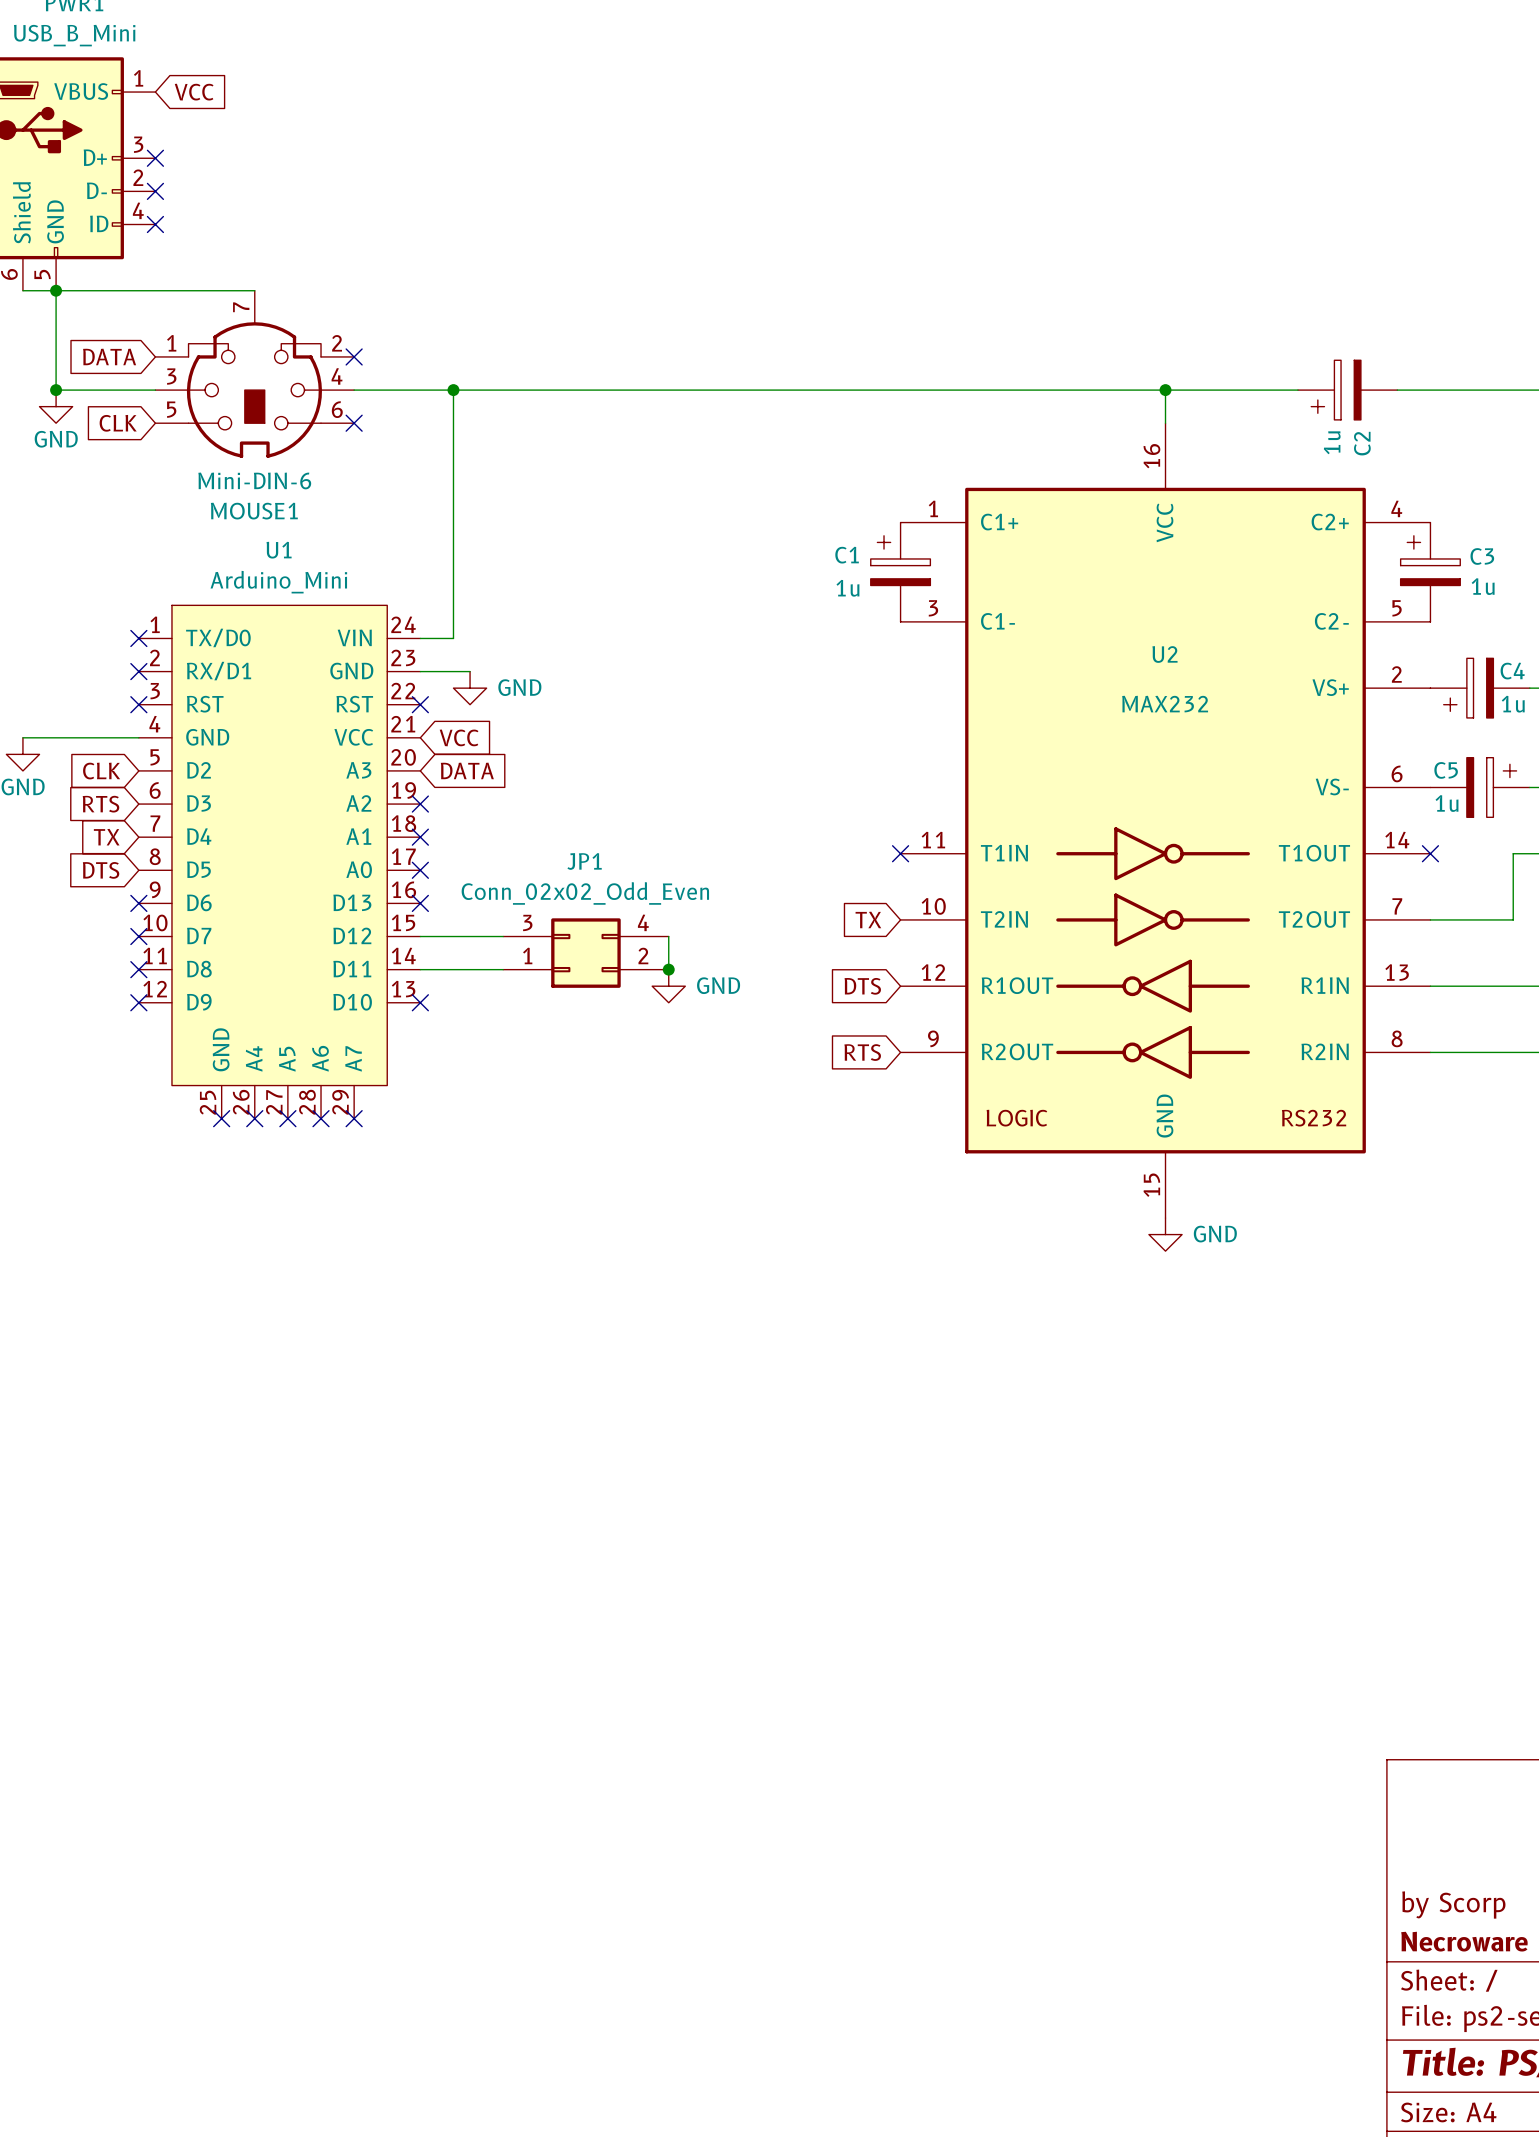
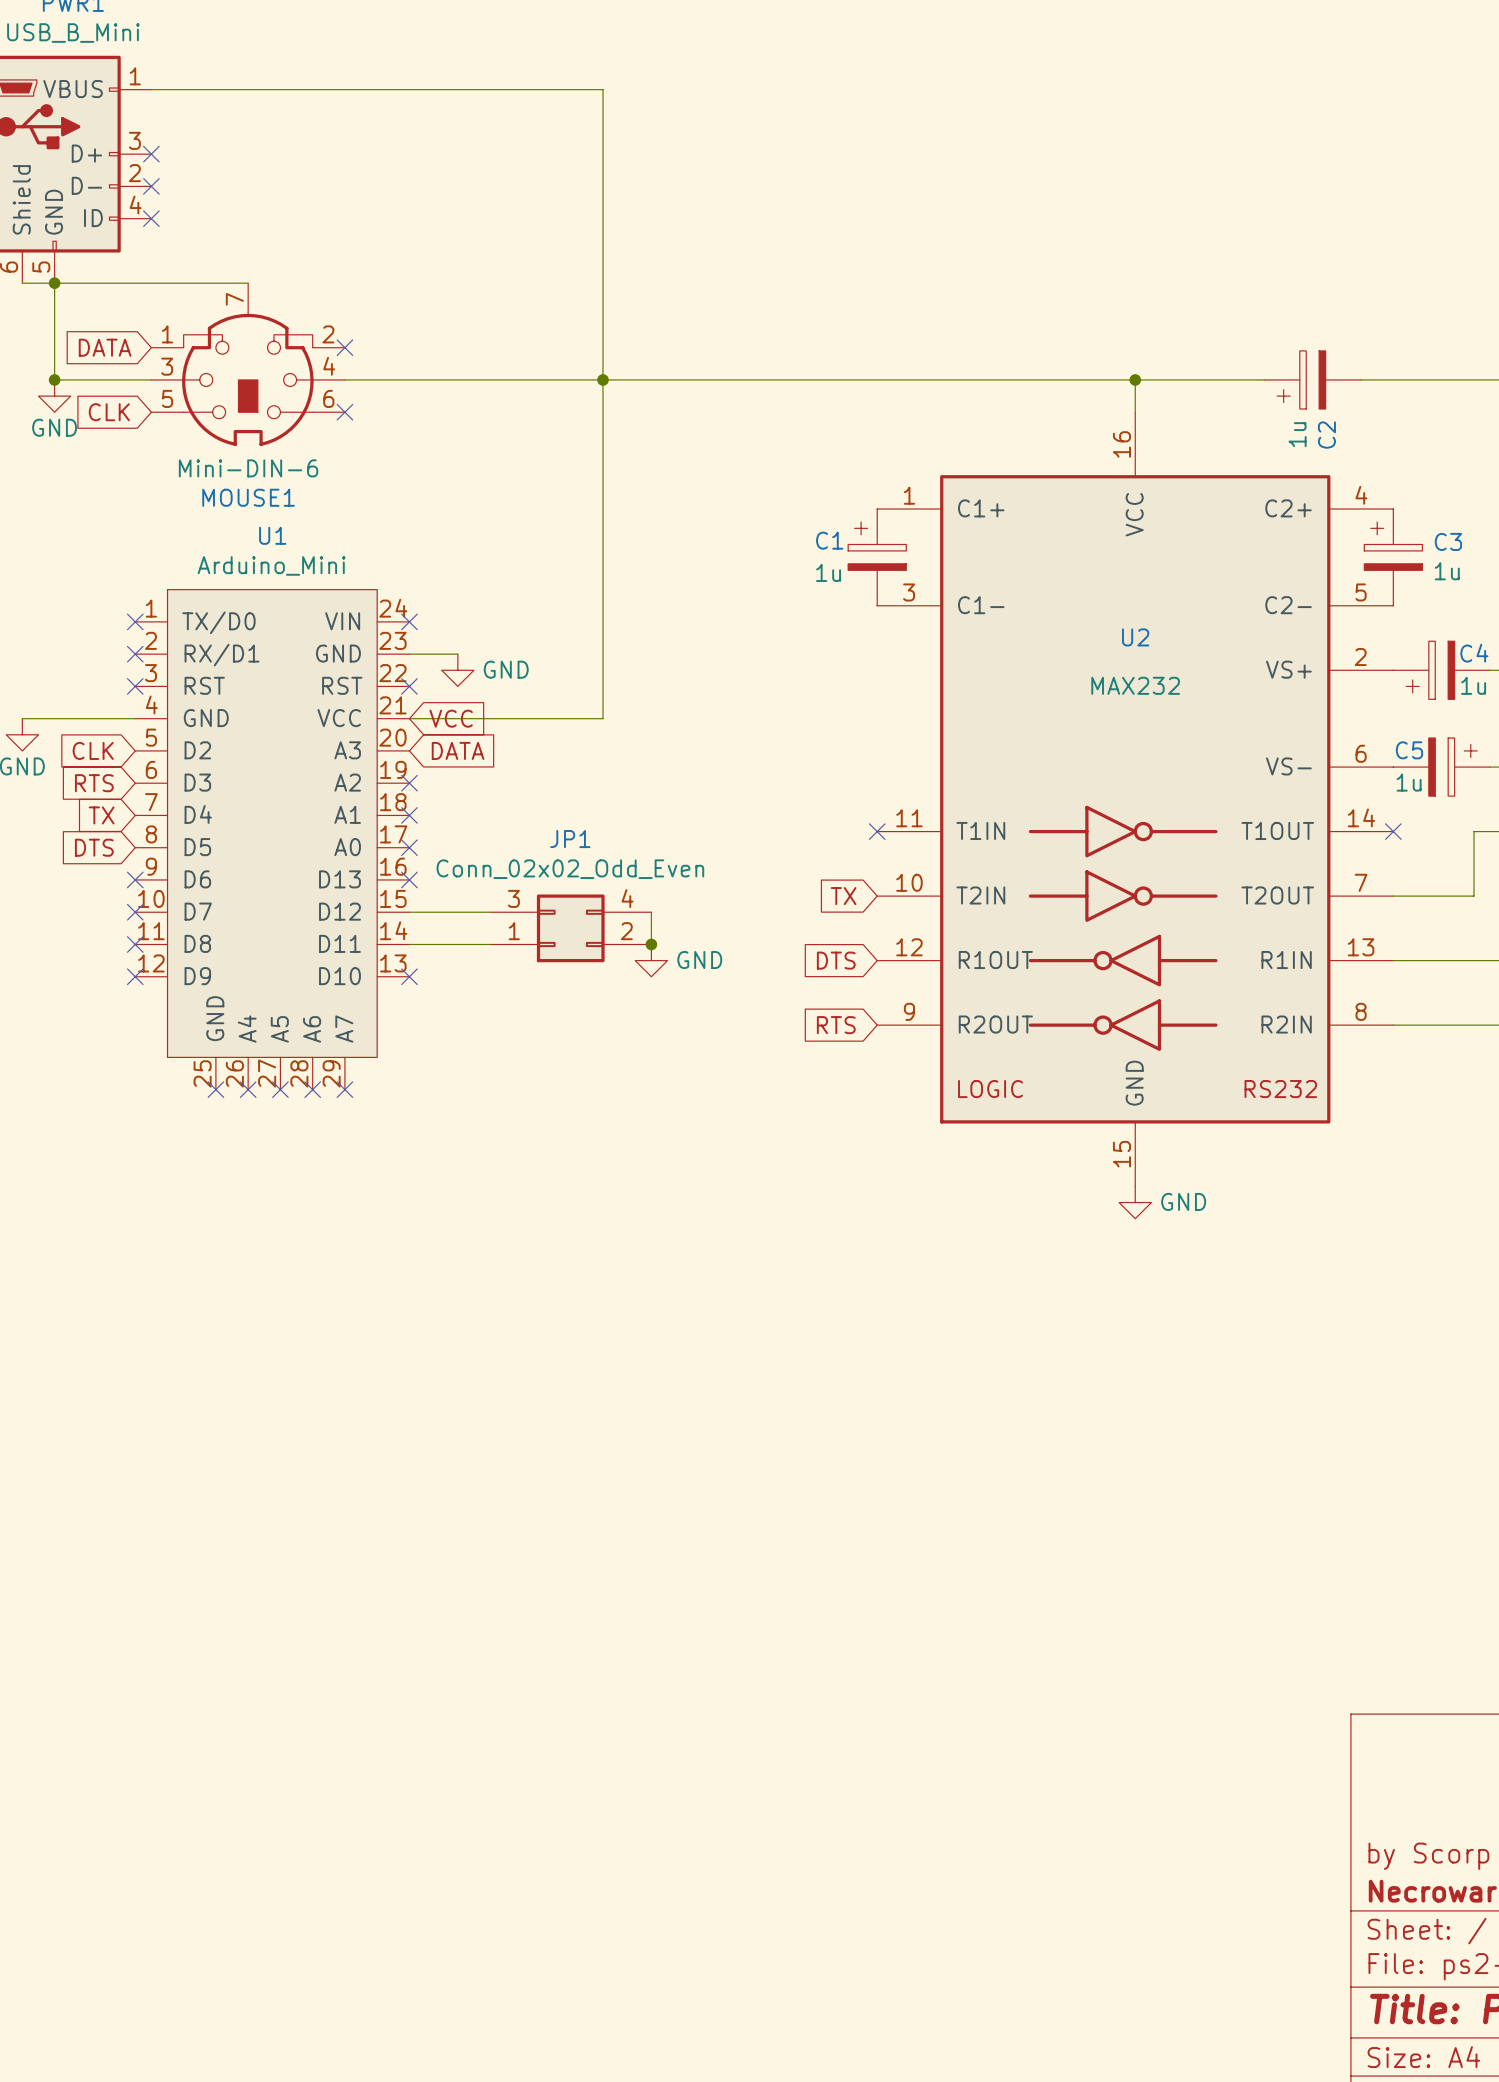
wire: none -> (151, 89) (603, 89) (603, 718) (409, 718)
global label: VCC (194, 92) -> none
wire: (453, 390) (453, 638) (420, 638) -> none
junction: (453, 390) -> none
junction: none -> (603, 379)
no-connect mark: none -> (409, 621)

